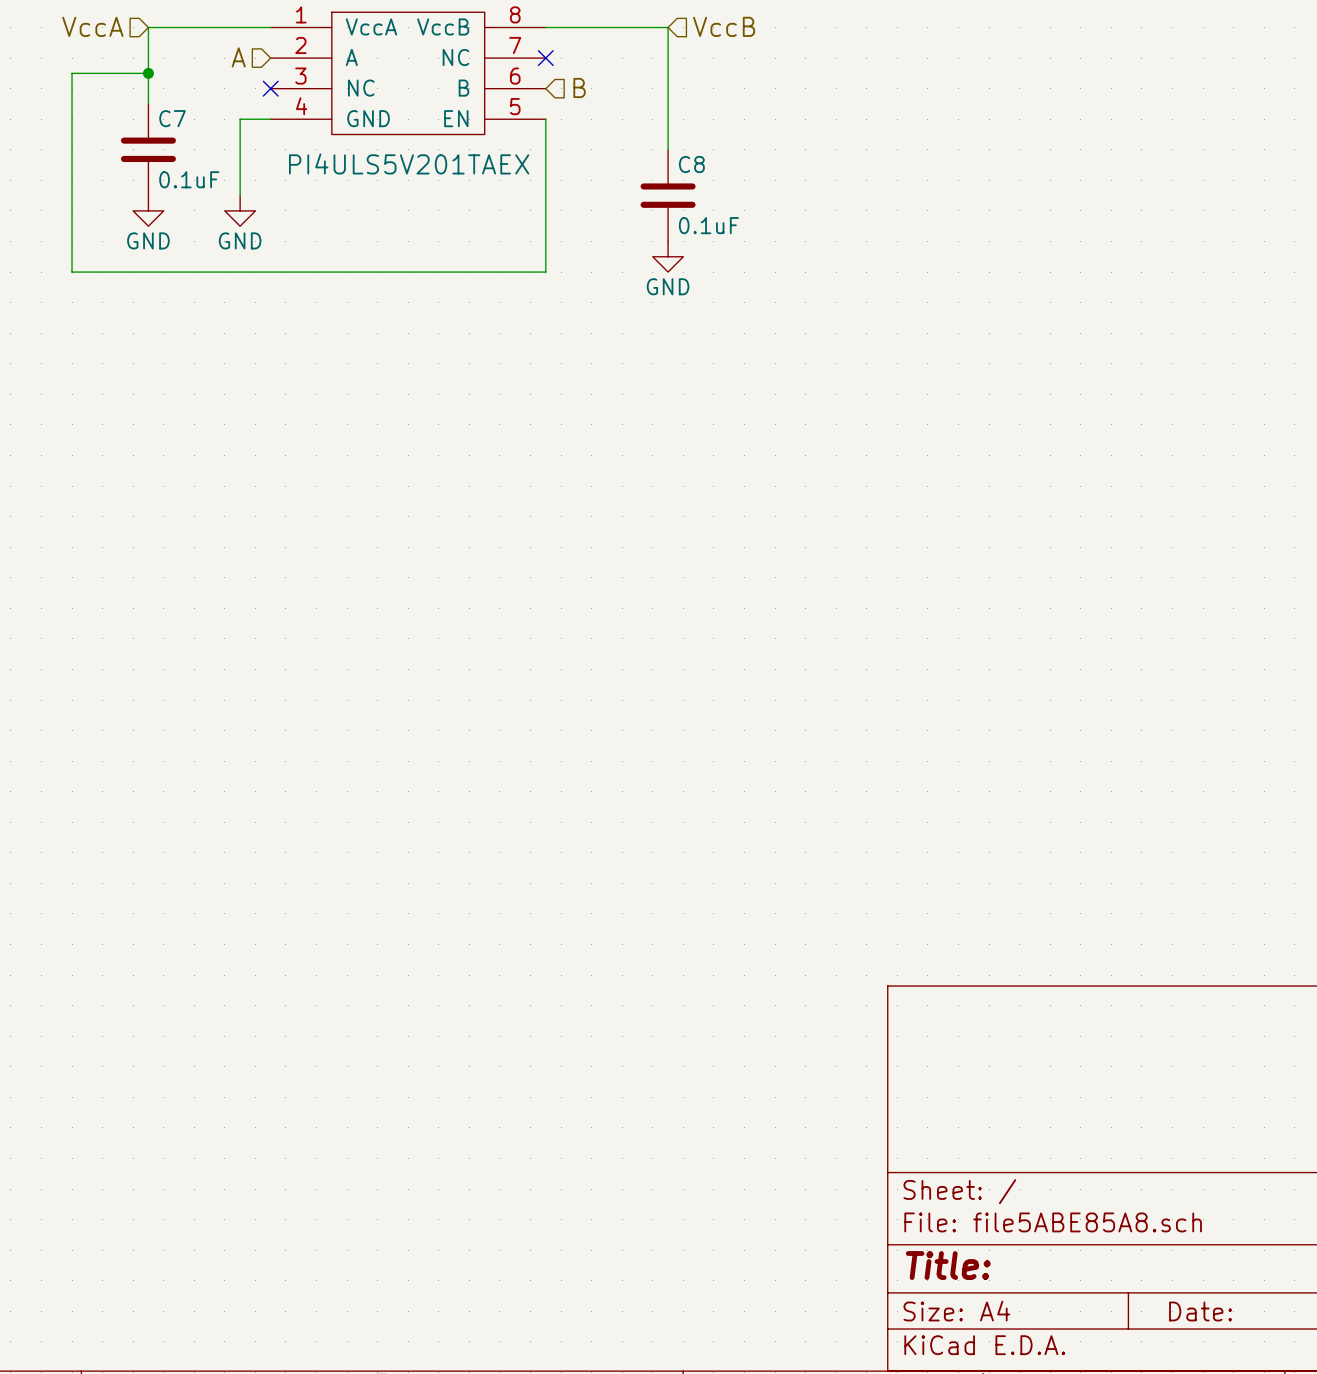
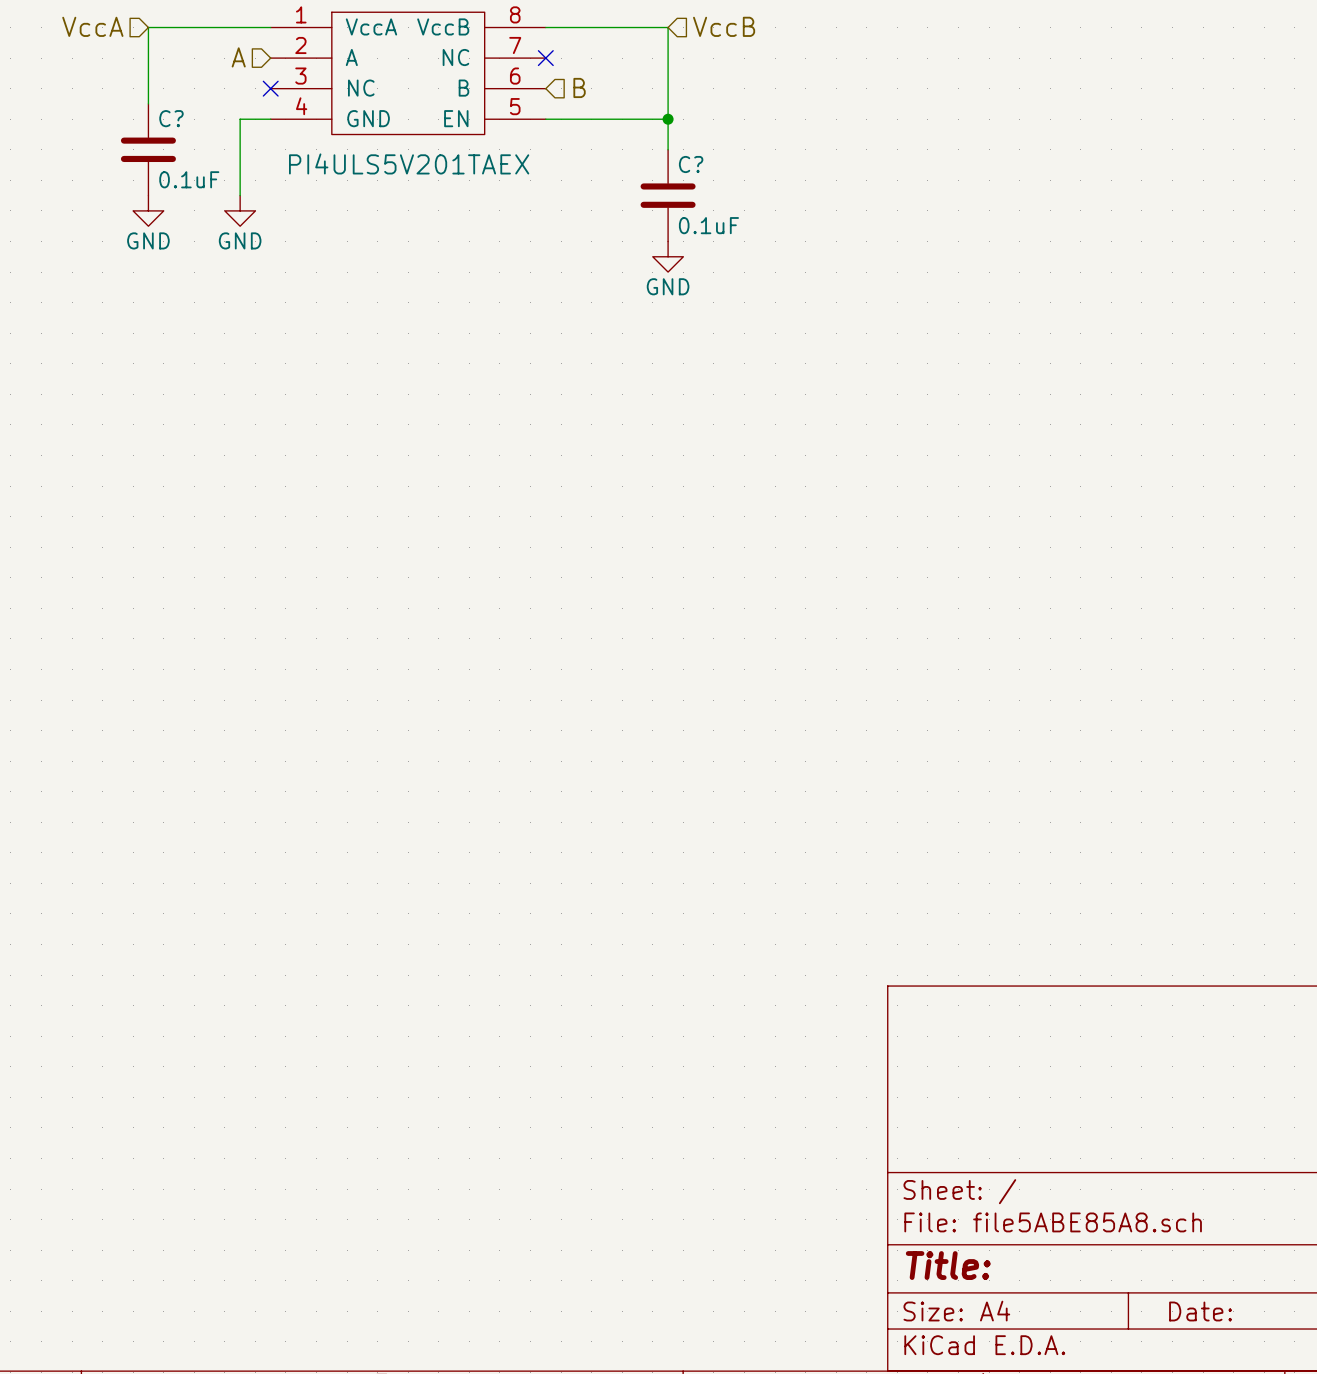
wire: (148, 73) (72, 73) (72, 272) (545, 272) (545, 119) -> (668, 119) (545, 119)
junction: (148, 73) -> none
C7 name: C7 (172, 118) -> C? (171, 118)
junction: none -> (668, 119)
C8 name: C8 (691, 164) -> C? (691, 164)

